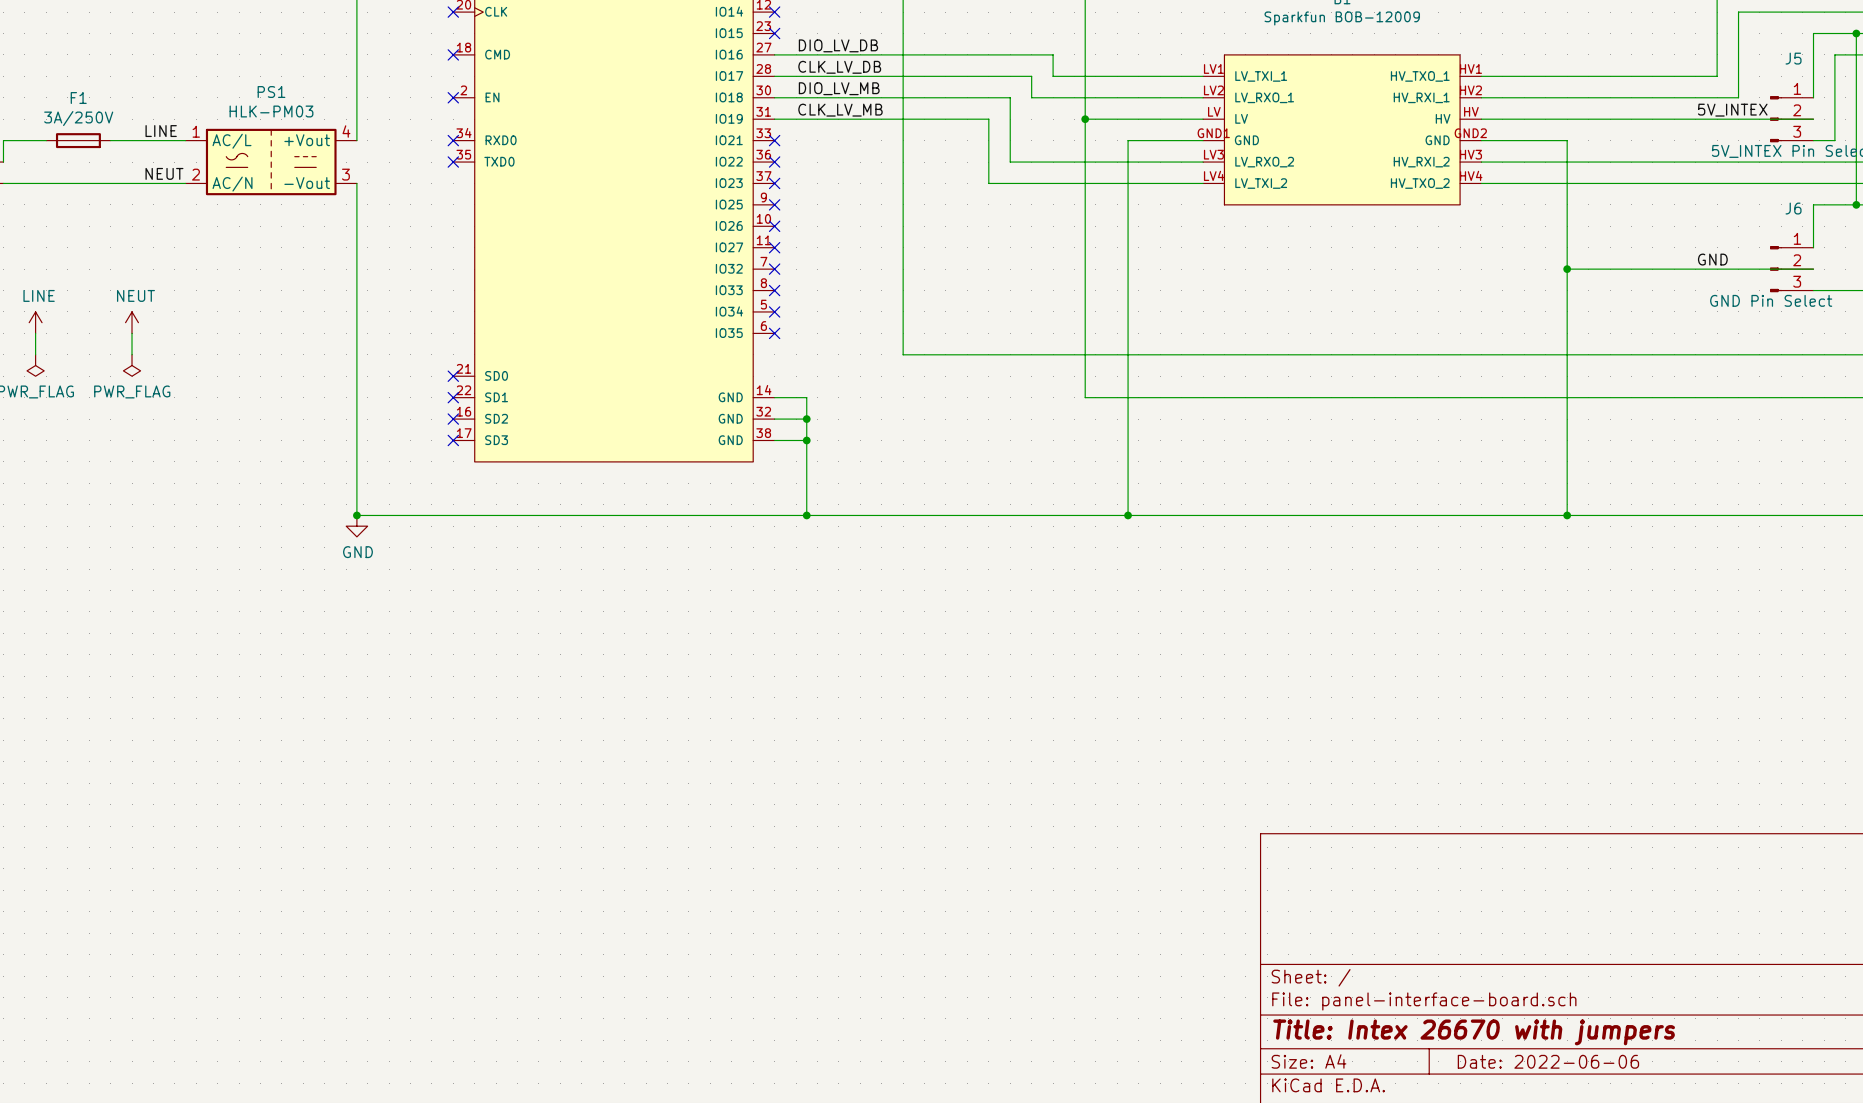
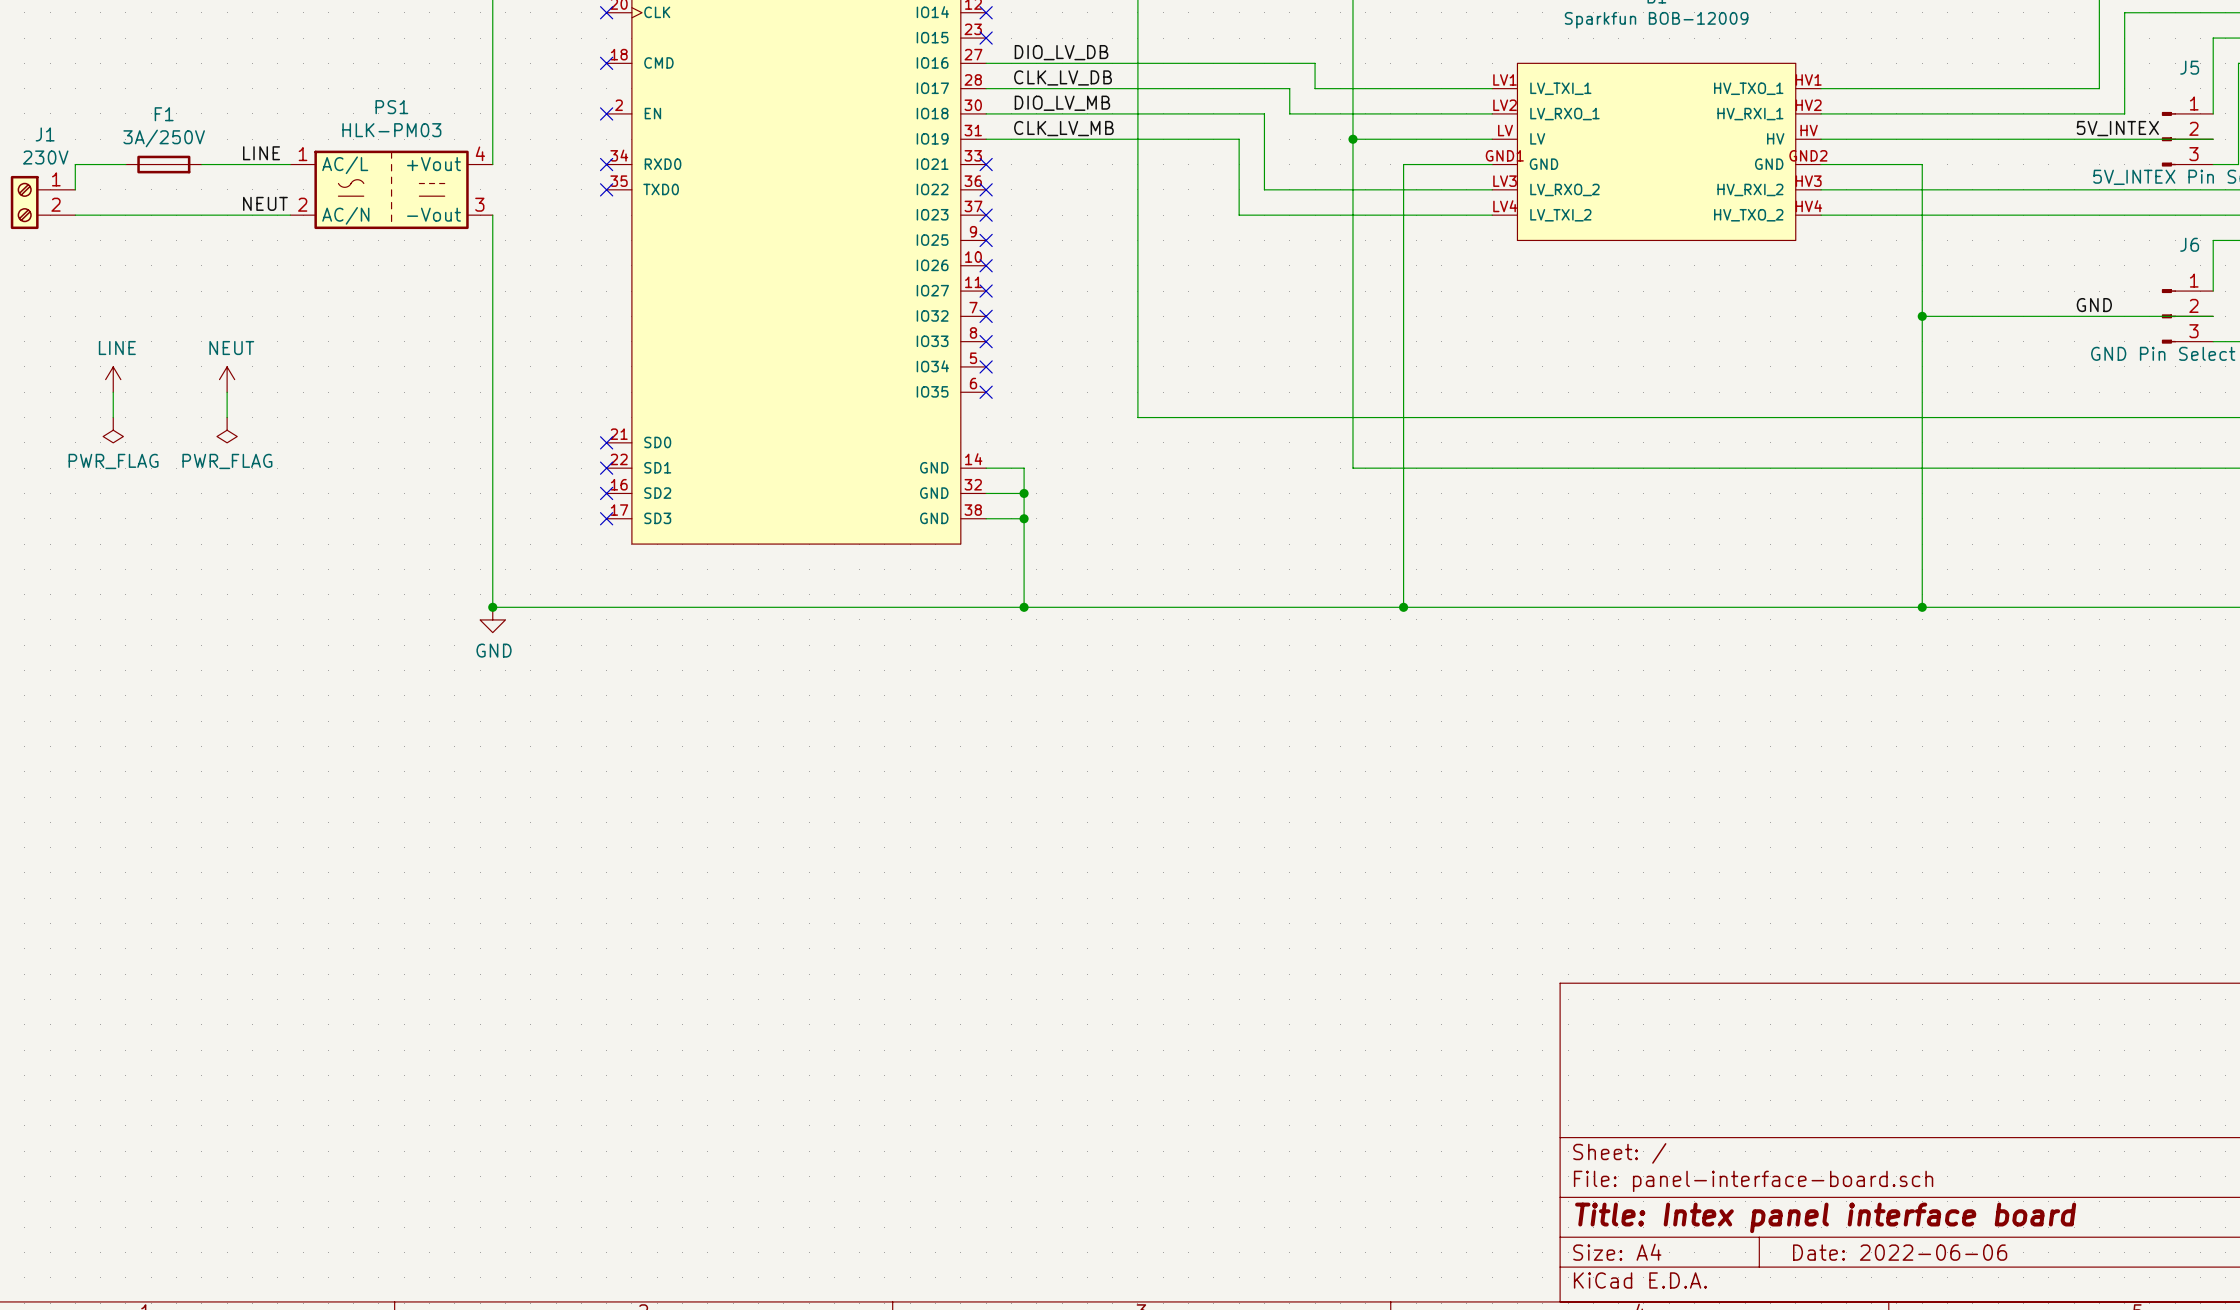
title block: Title: Intex 26670 with jumpers (1474, 1032) -> Title: Intex panel interface board (1825, 1217)

